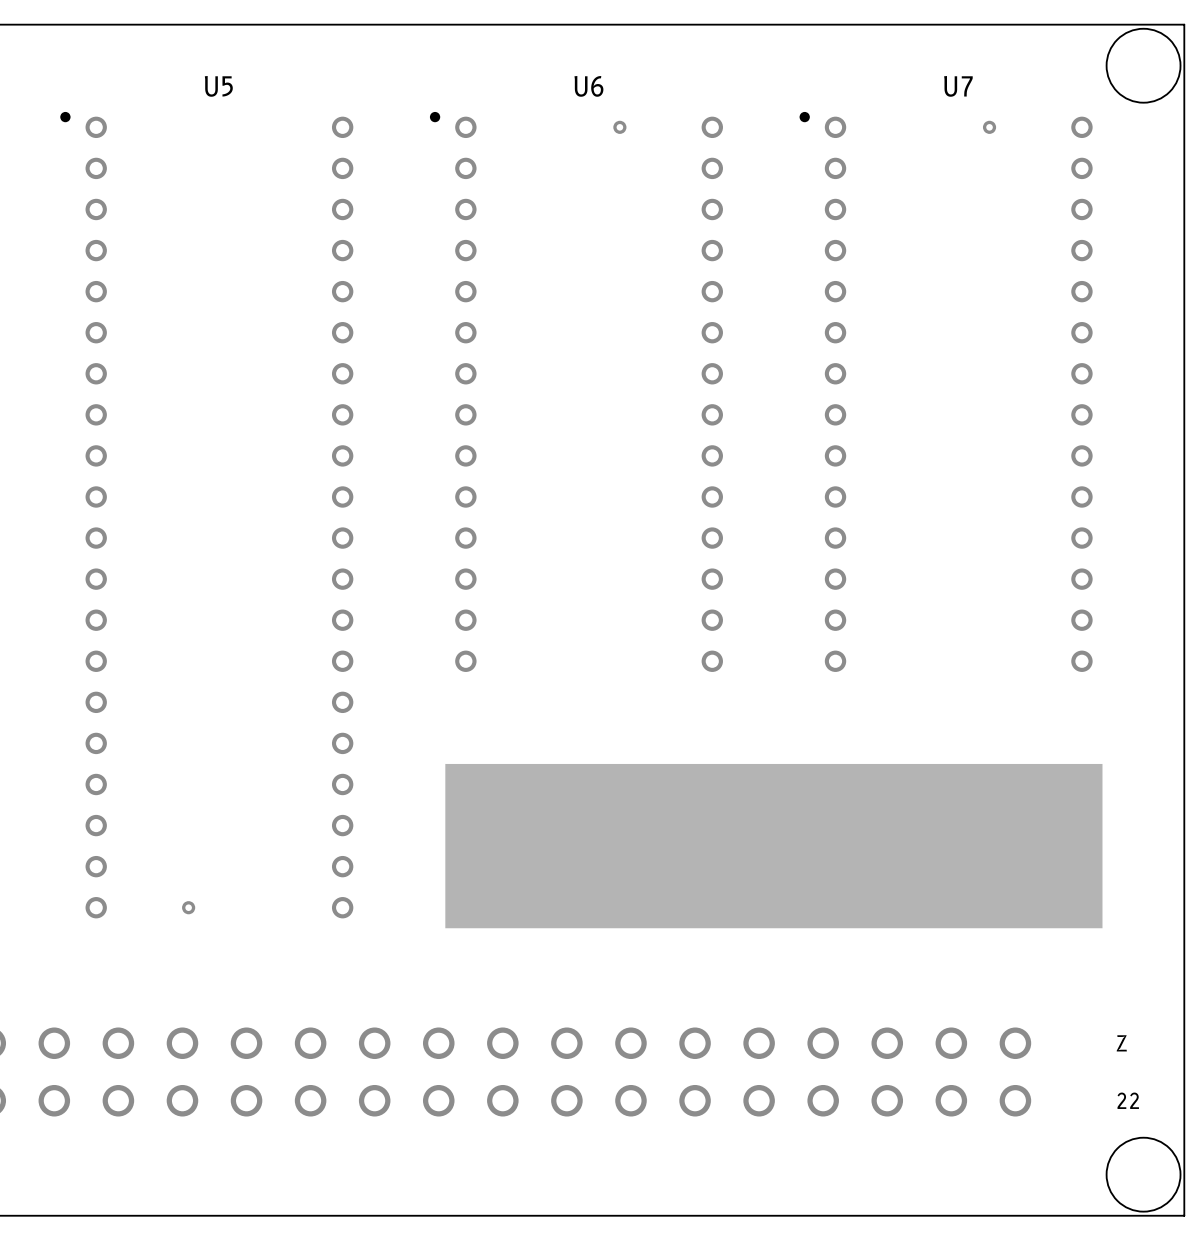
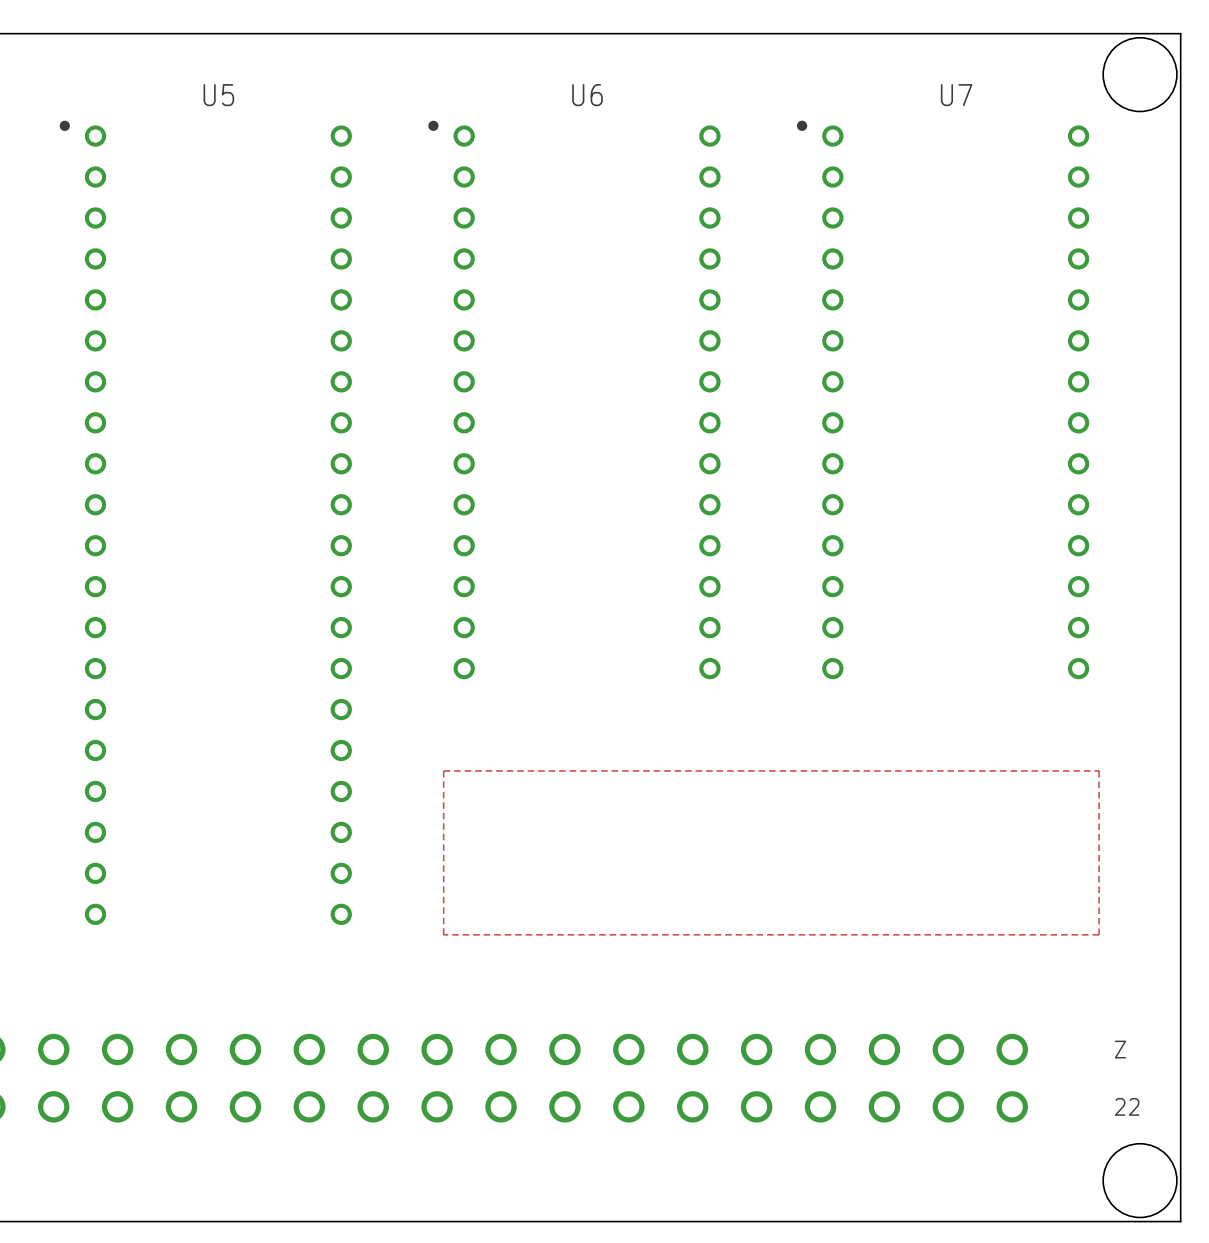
via: (619, 127) -> none
via: (989, 127) -> none
zone outline: none -> (443, 770) (1099, 770) (1099, 934) (443, 934) (443, 770)
drawing: [445, 763, 1103, 929] -> none
via: (188, 907) -> none

